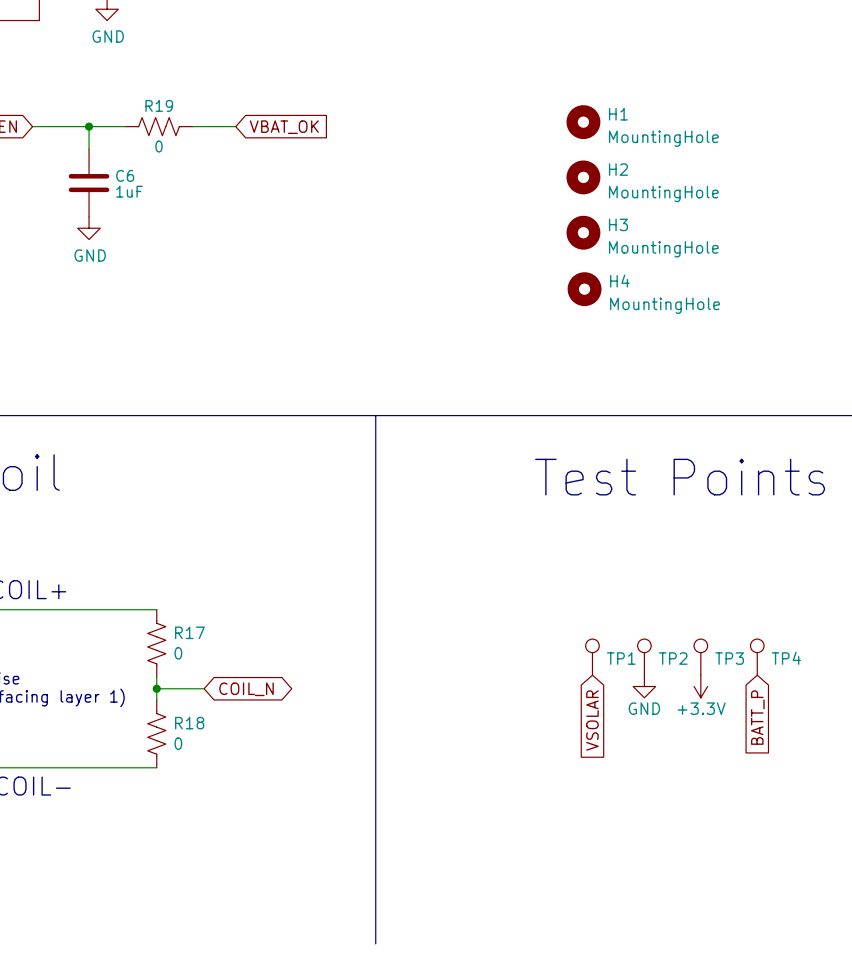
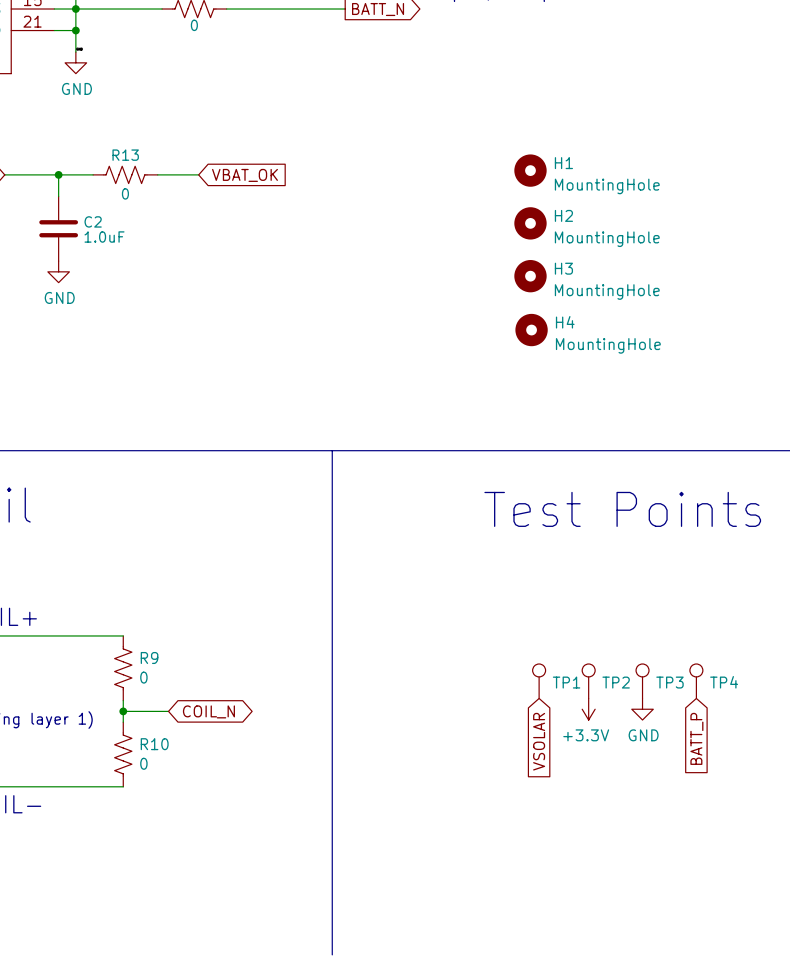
R19 name: R19 (159, 105) -> R13 (125, 155)
C6 name: C6 (125, 175) -> C2 (93, 221)
C6 value: 1uF (129, 191) -> 1.0uF (104, 237)
R17 name: R17 (189, 632) -> R9 (149, 657)
power symbol: GND (644, 686) -> +3.3V (588, 709)
power symbol: +3.3V (700, 686) -> GND (642, 709)
R18 name: R18 (189, 723) -> R10 (154, 744)

